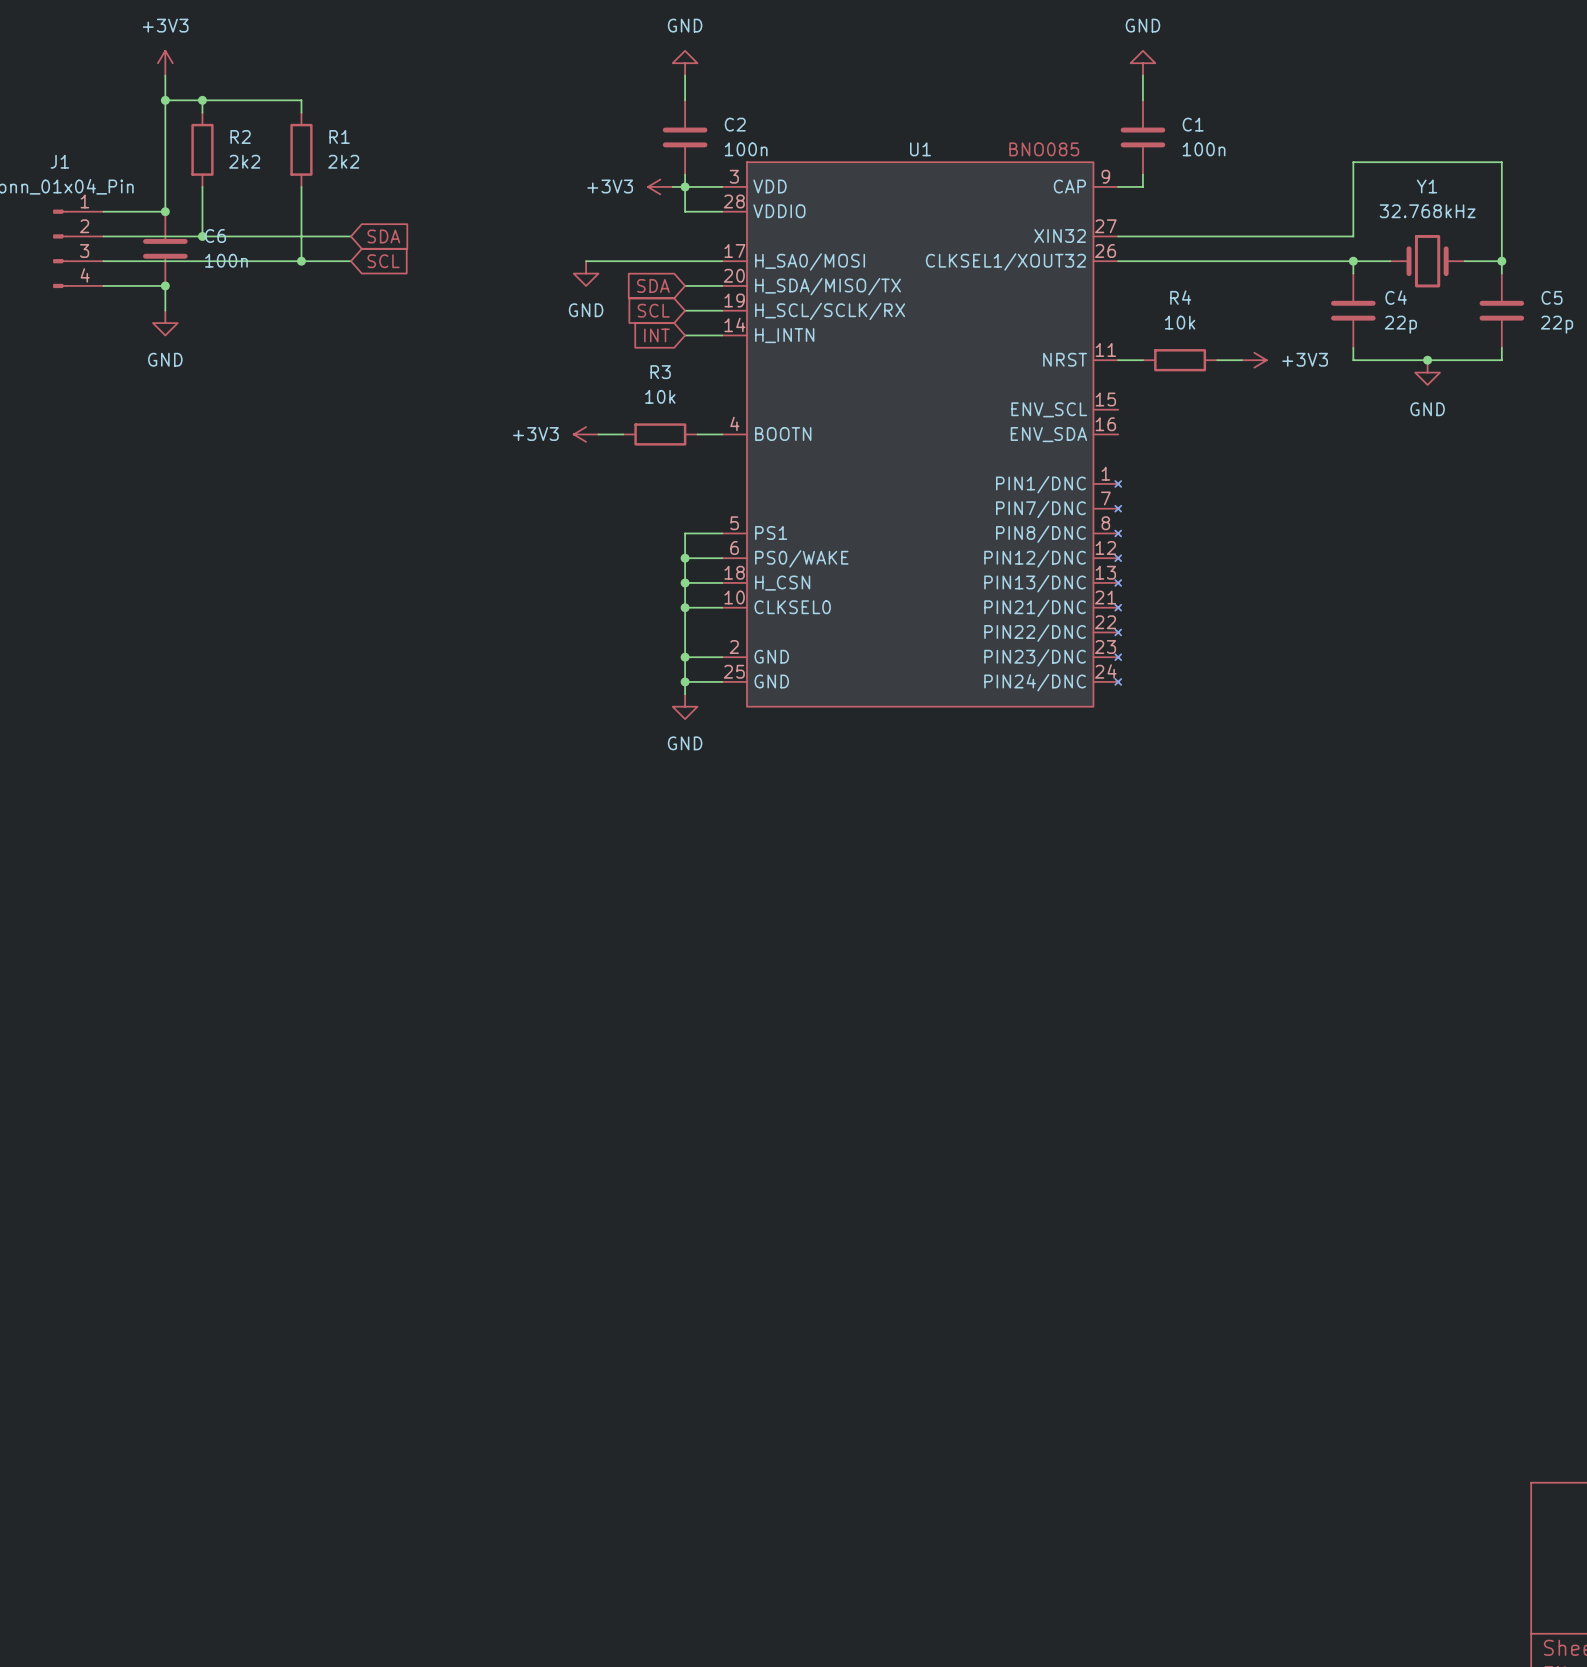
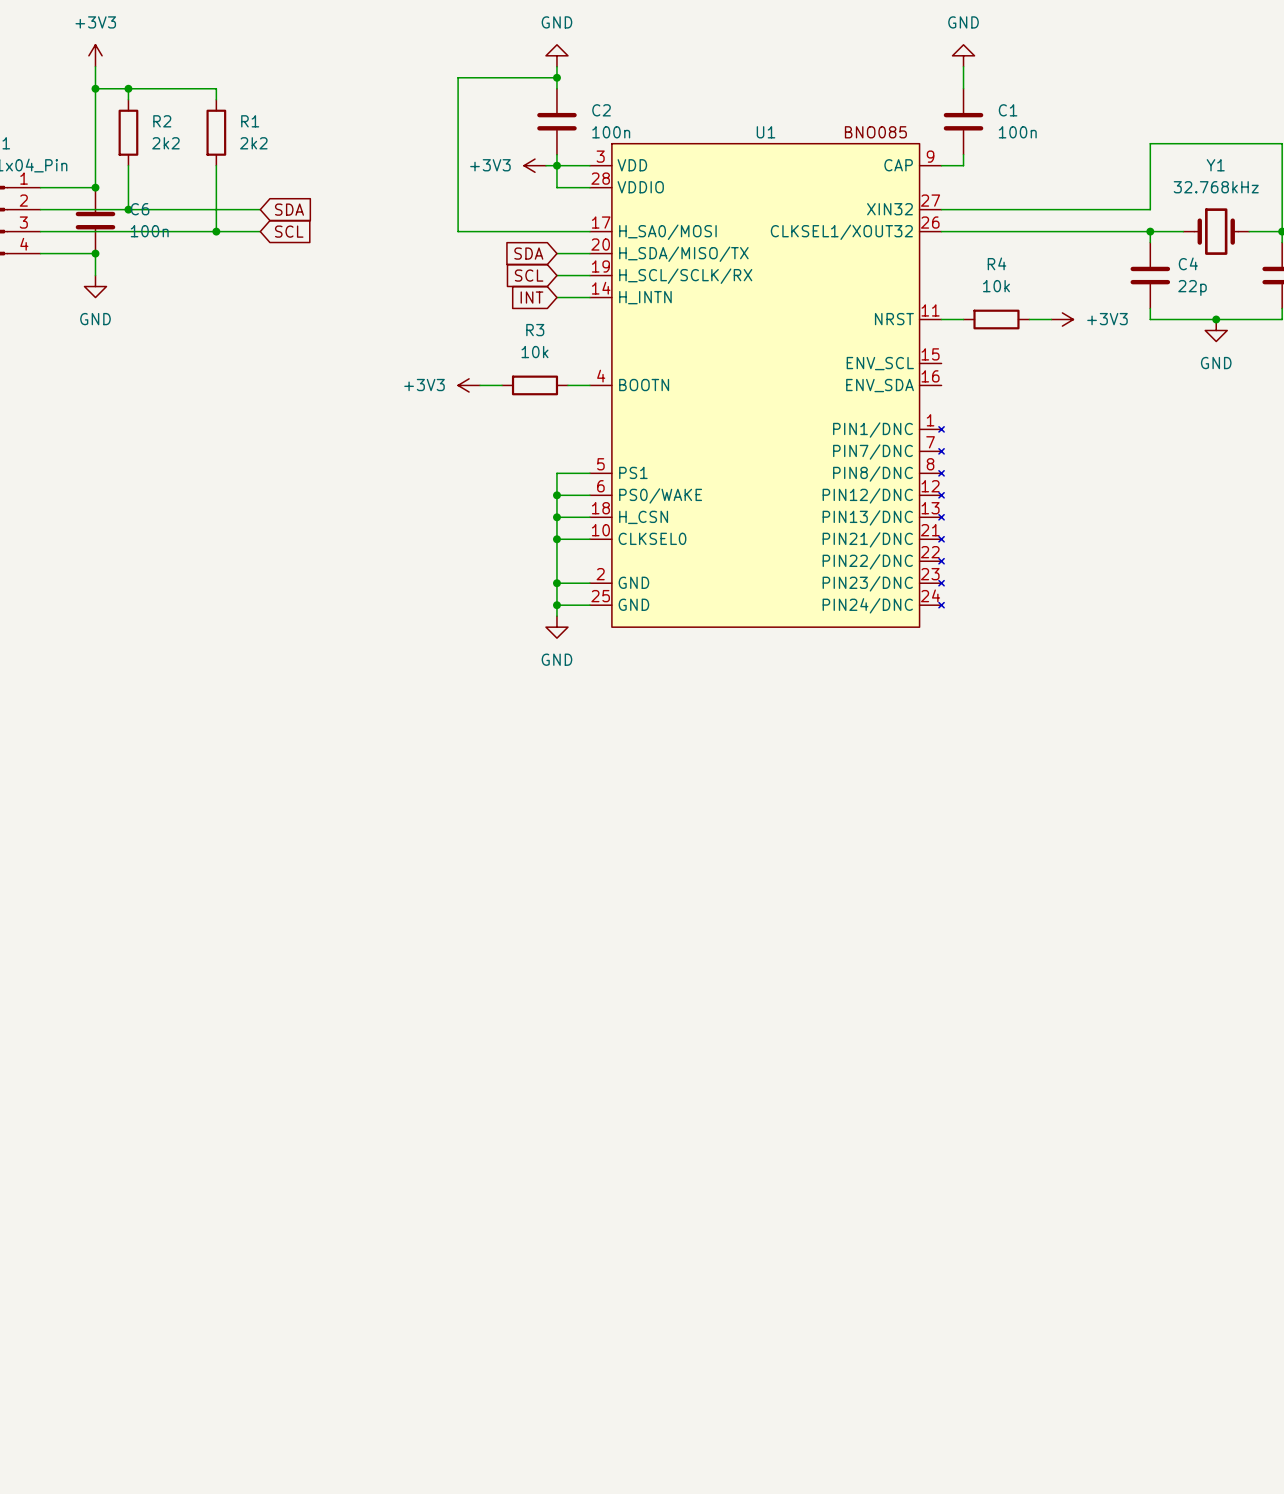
wire: none -> (556, 77) (458, 77) (458, 231) (469, 231)
junction: none -> (556, 77)
power symbol: GND (586, 273) -> none

